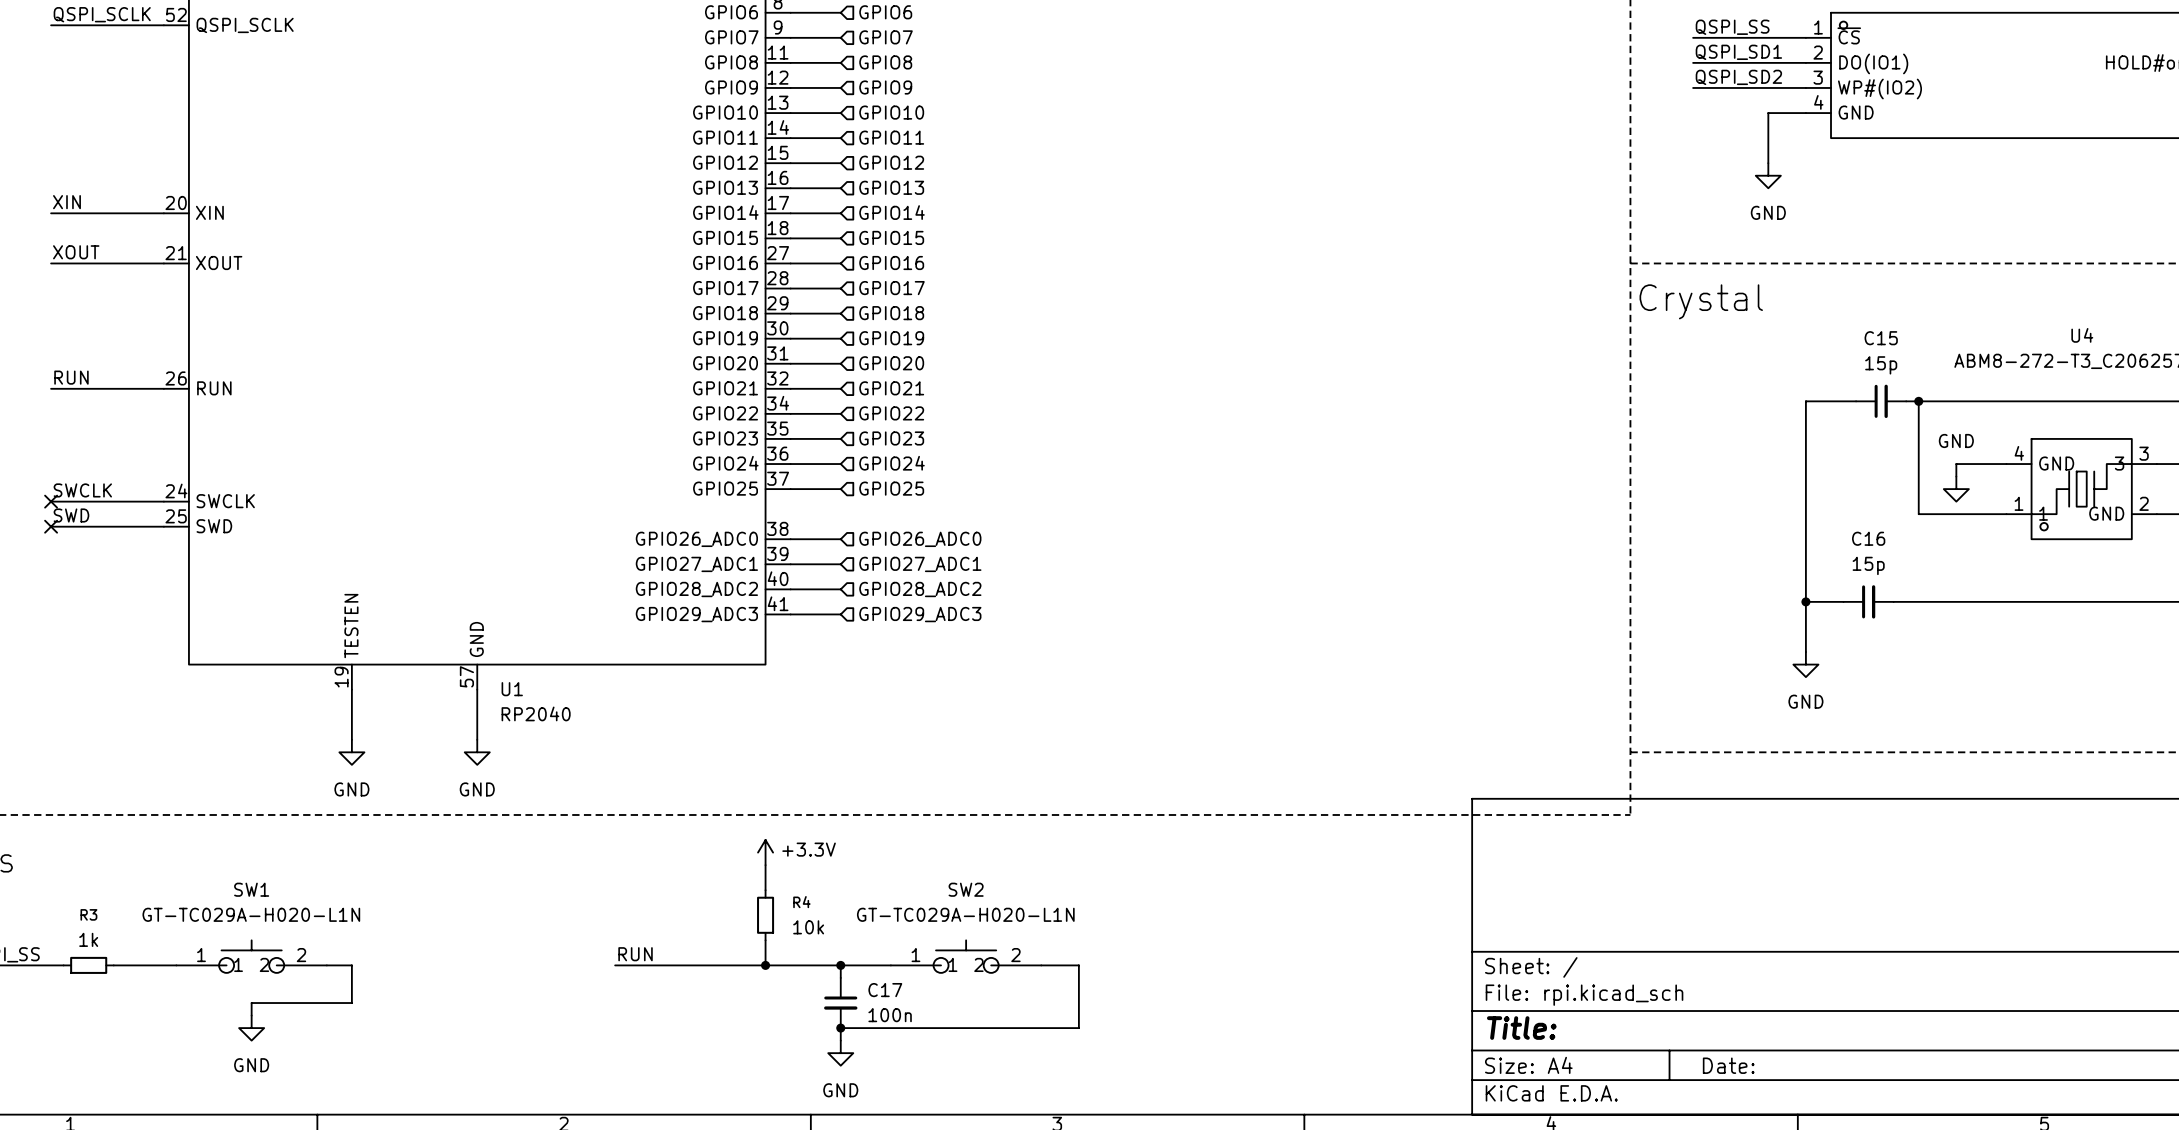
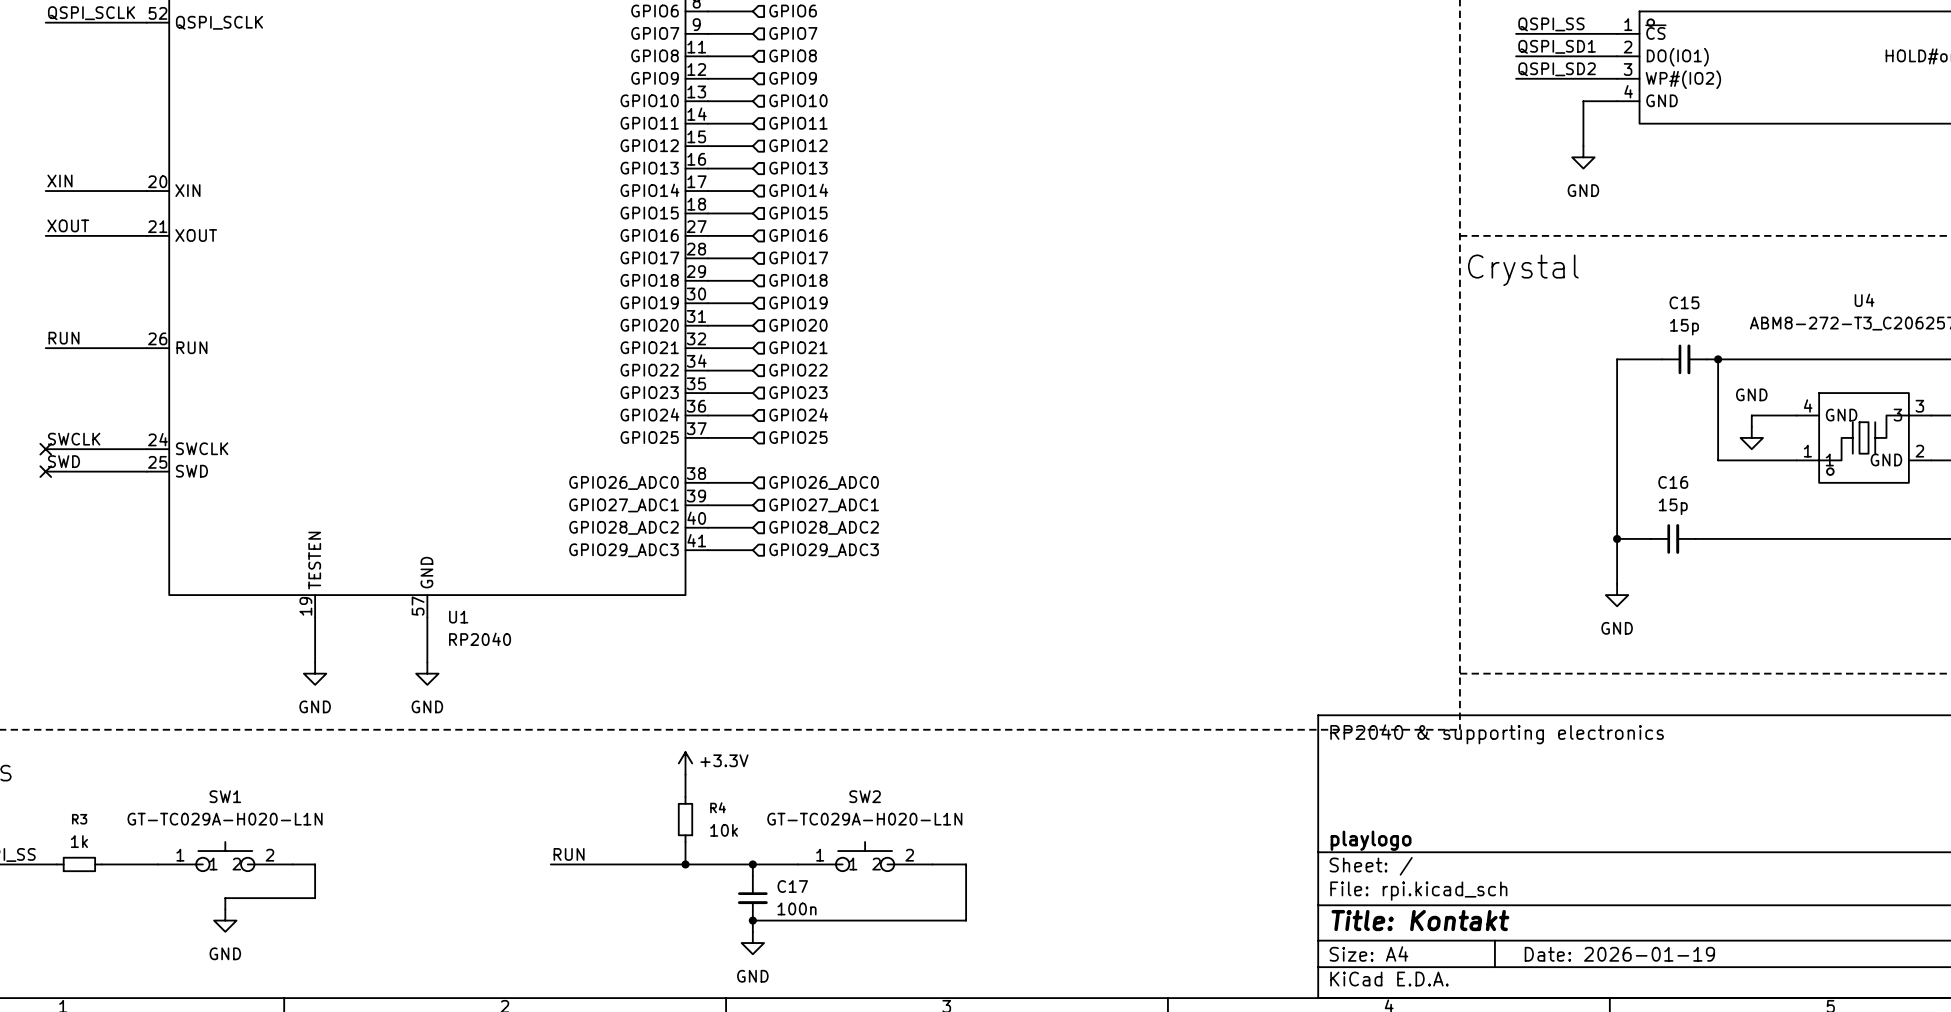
title block: none -> RP2040 & supporting electronics (1497, 734)
title block: none -> playlogo (1371, 840)
title block: Title: (1521, 1028) -> Title: Kontakt (1420, 920)
title block: Date: (1728, 1065) -> Date: 2026-01-19 (1619, 954)

